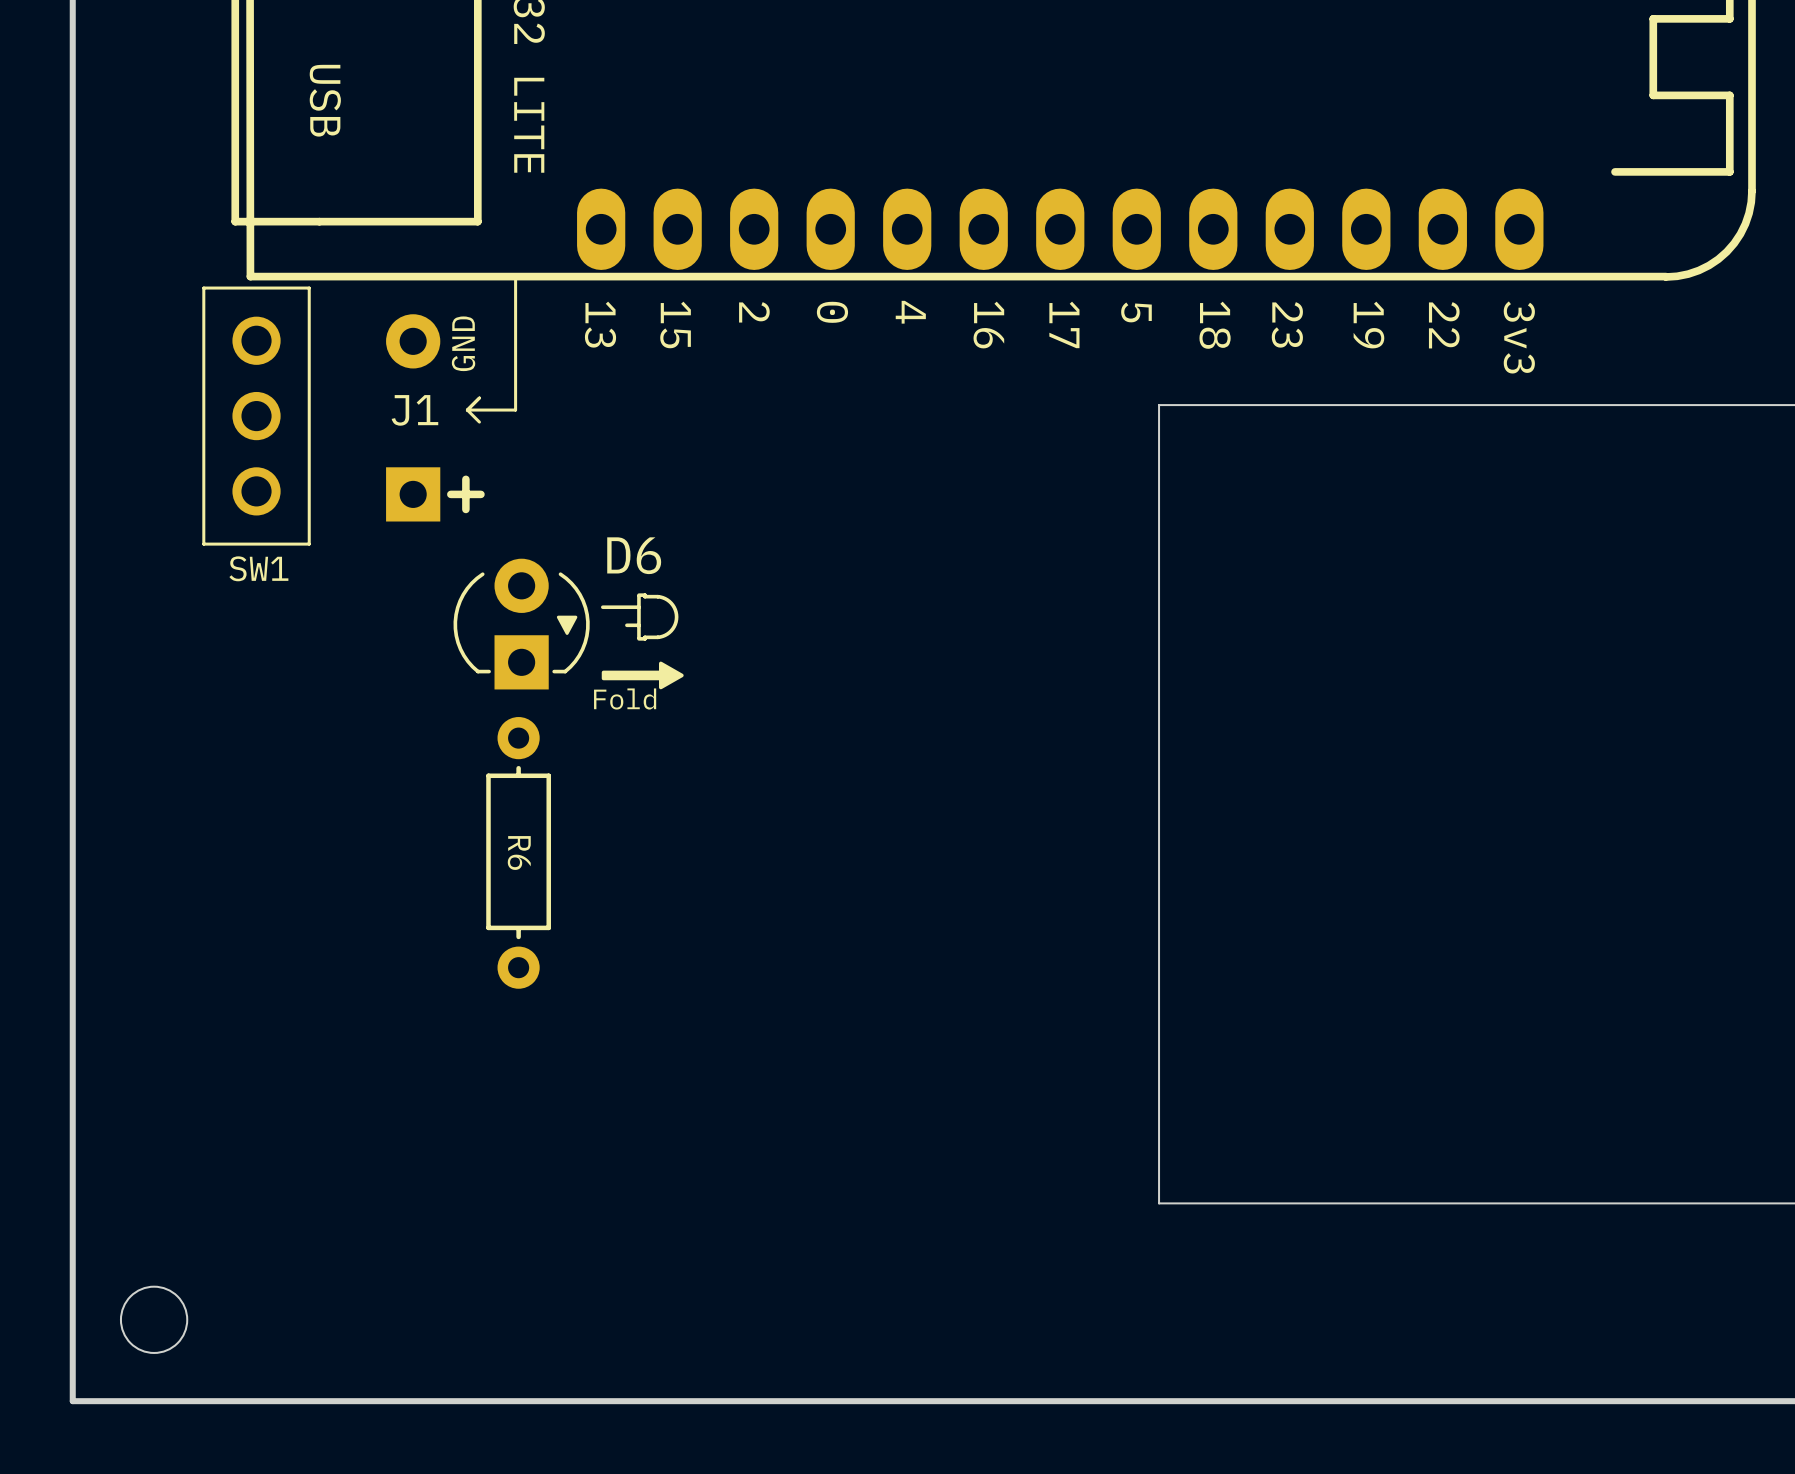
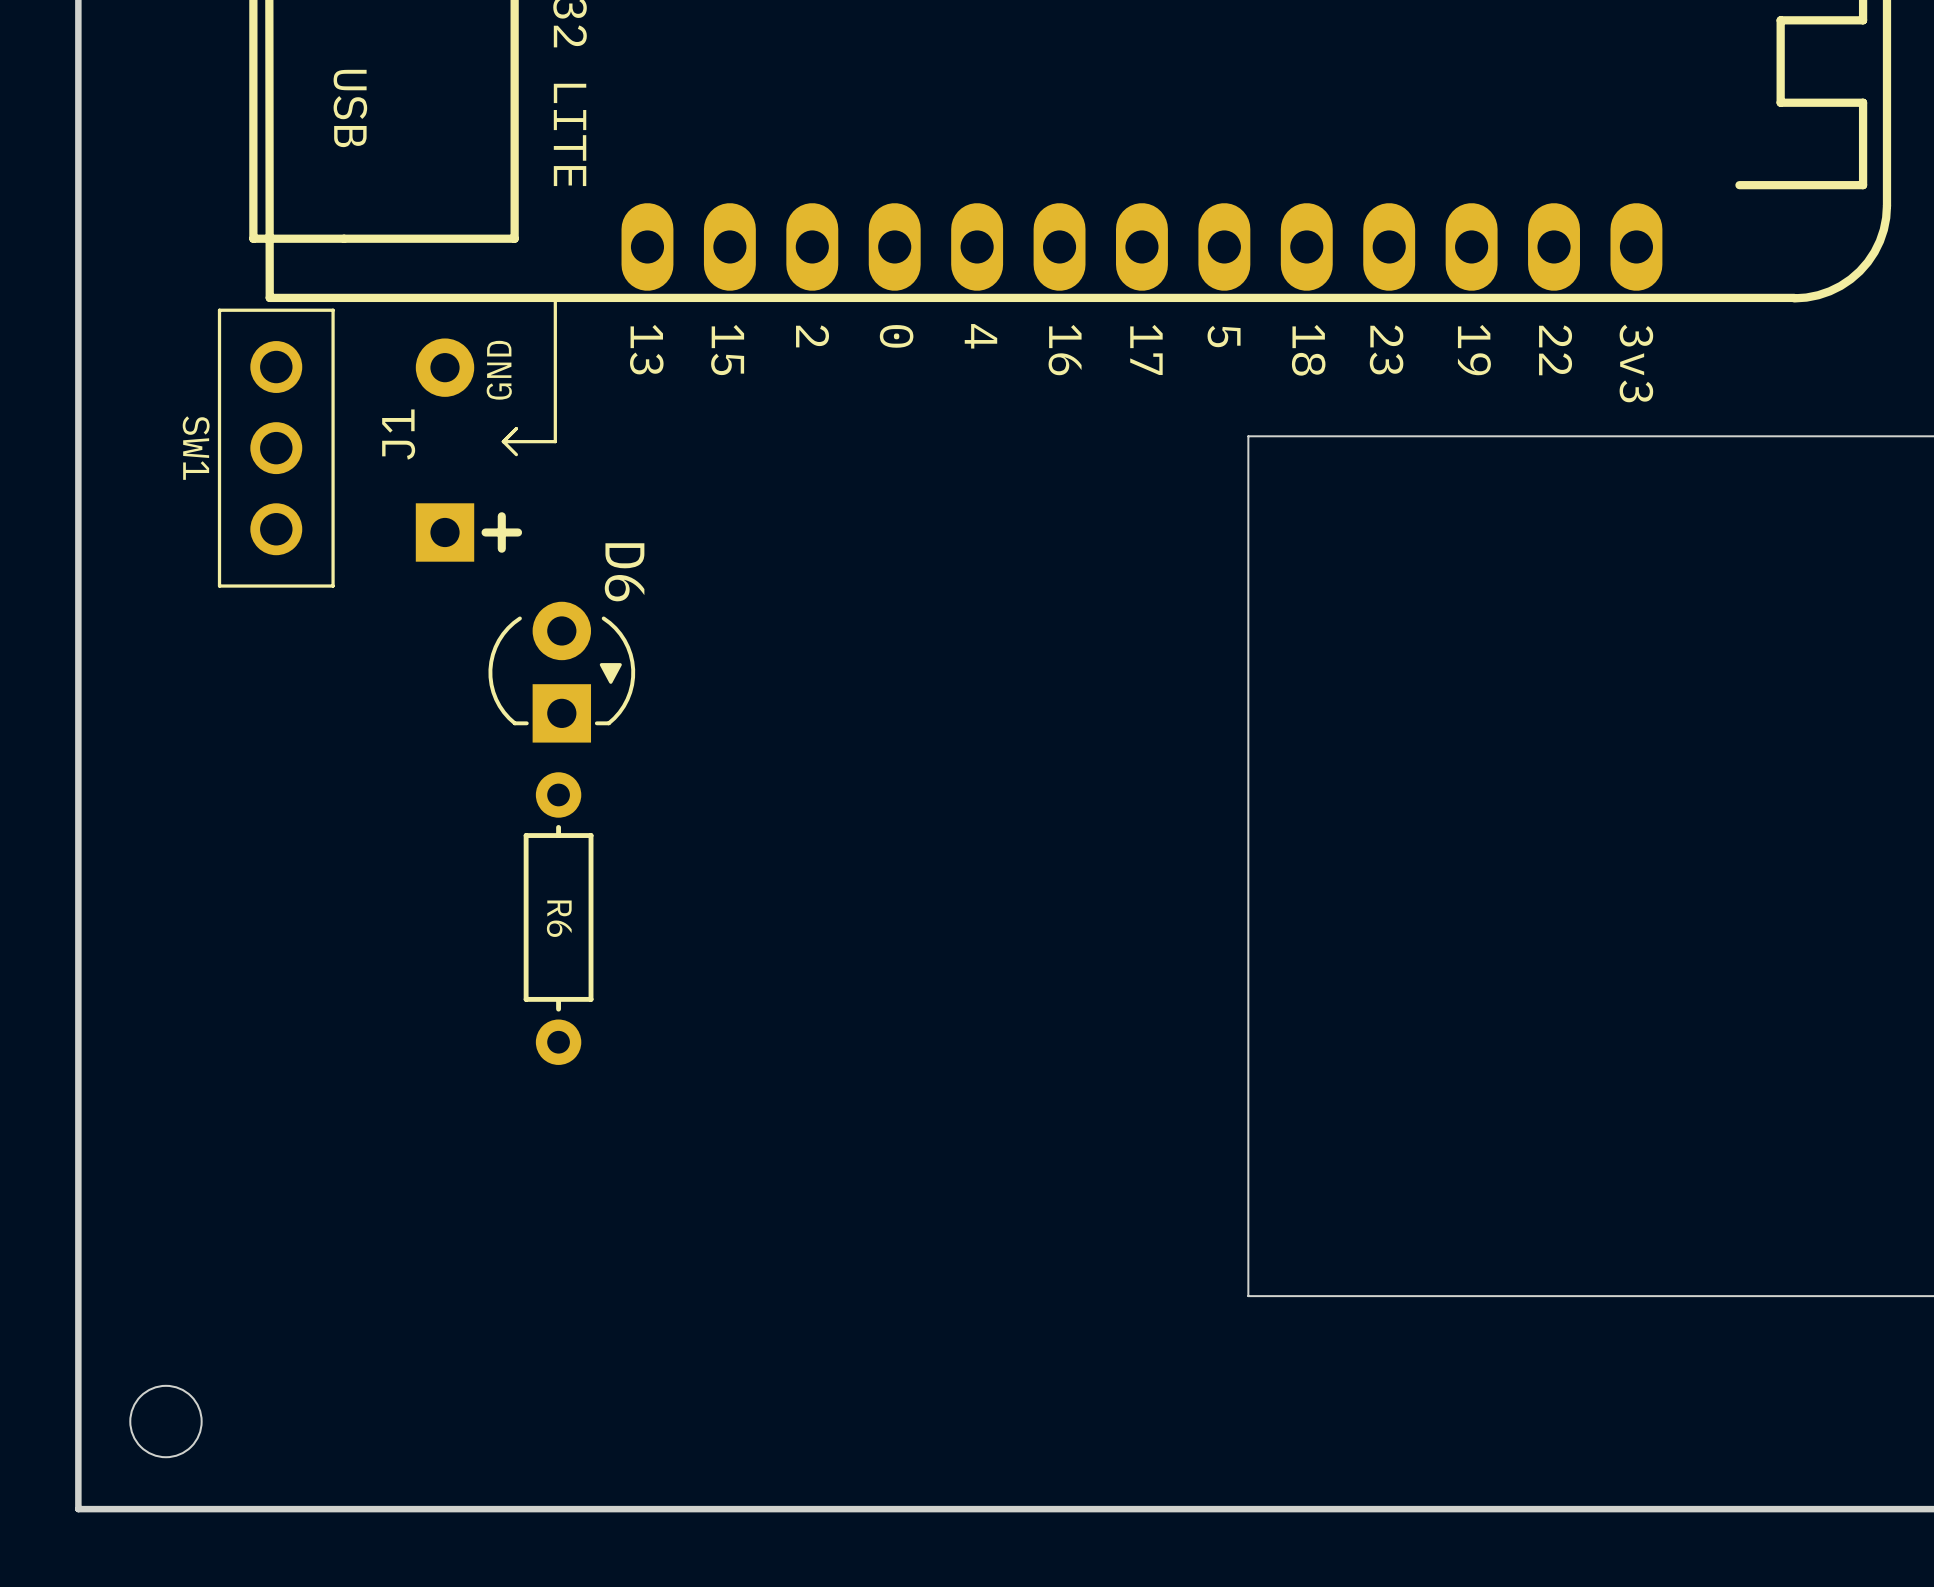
J1 name rotation: 0° (414, 410) -> 90° counterclockwise (398, 434)
D6 name rotation: 0° (634, 555) -> 90° clockwise (624, 572)
SW1 name rotation: 0° (258, 568) -> 90° clockwise (196, 448)
SW1 name position: SW1 (258, 568) -> SW1 (196, 448)
drawing: [601, 593, 684, 690] -> none

